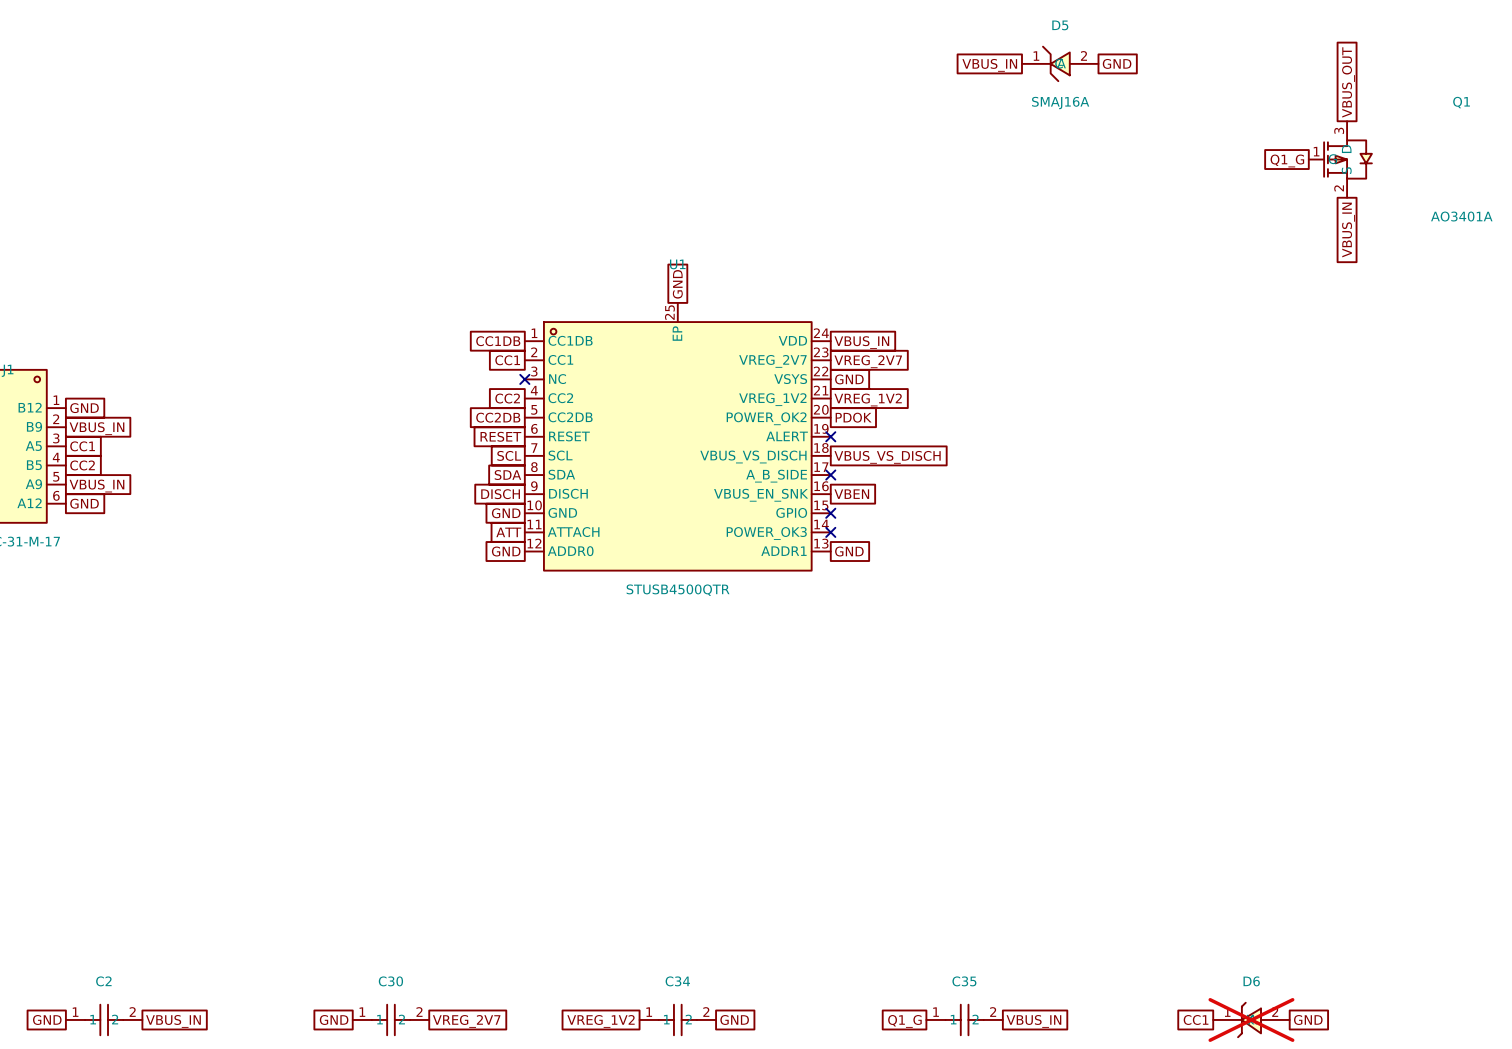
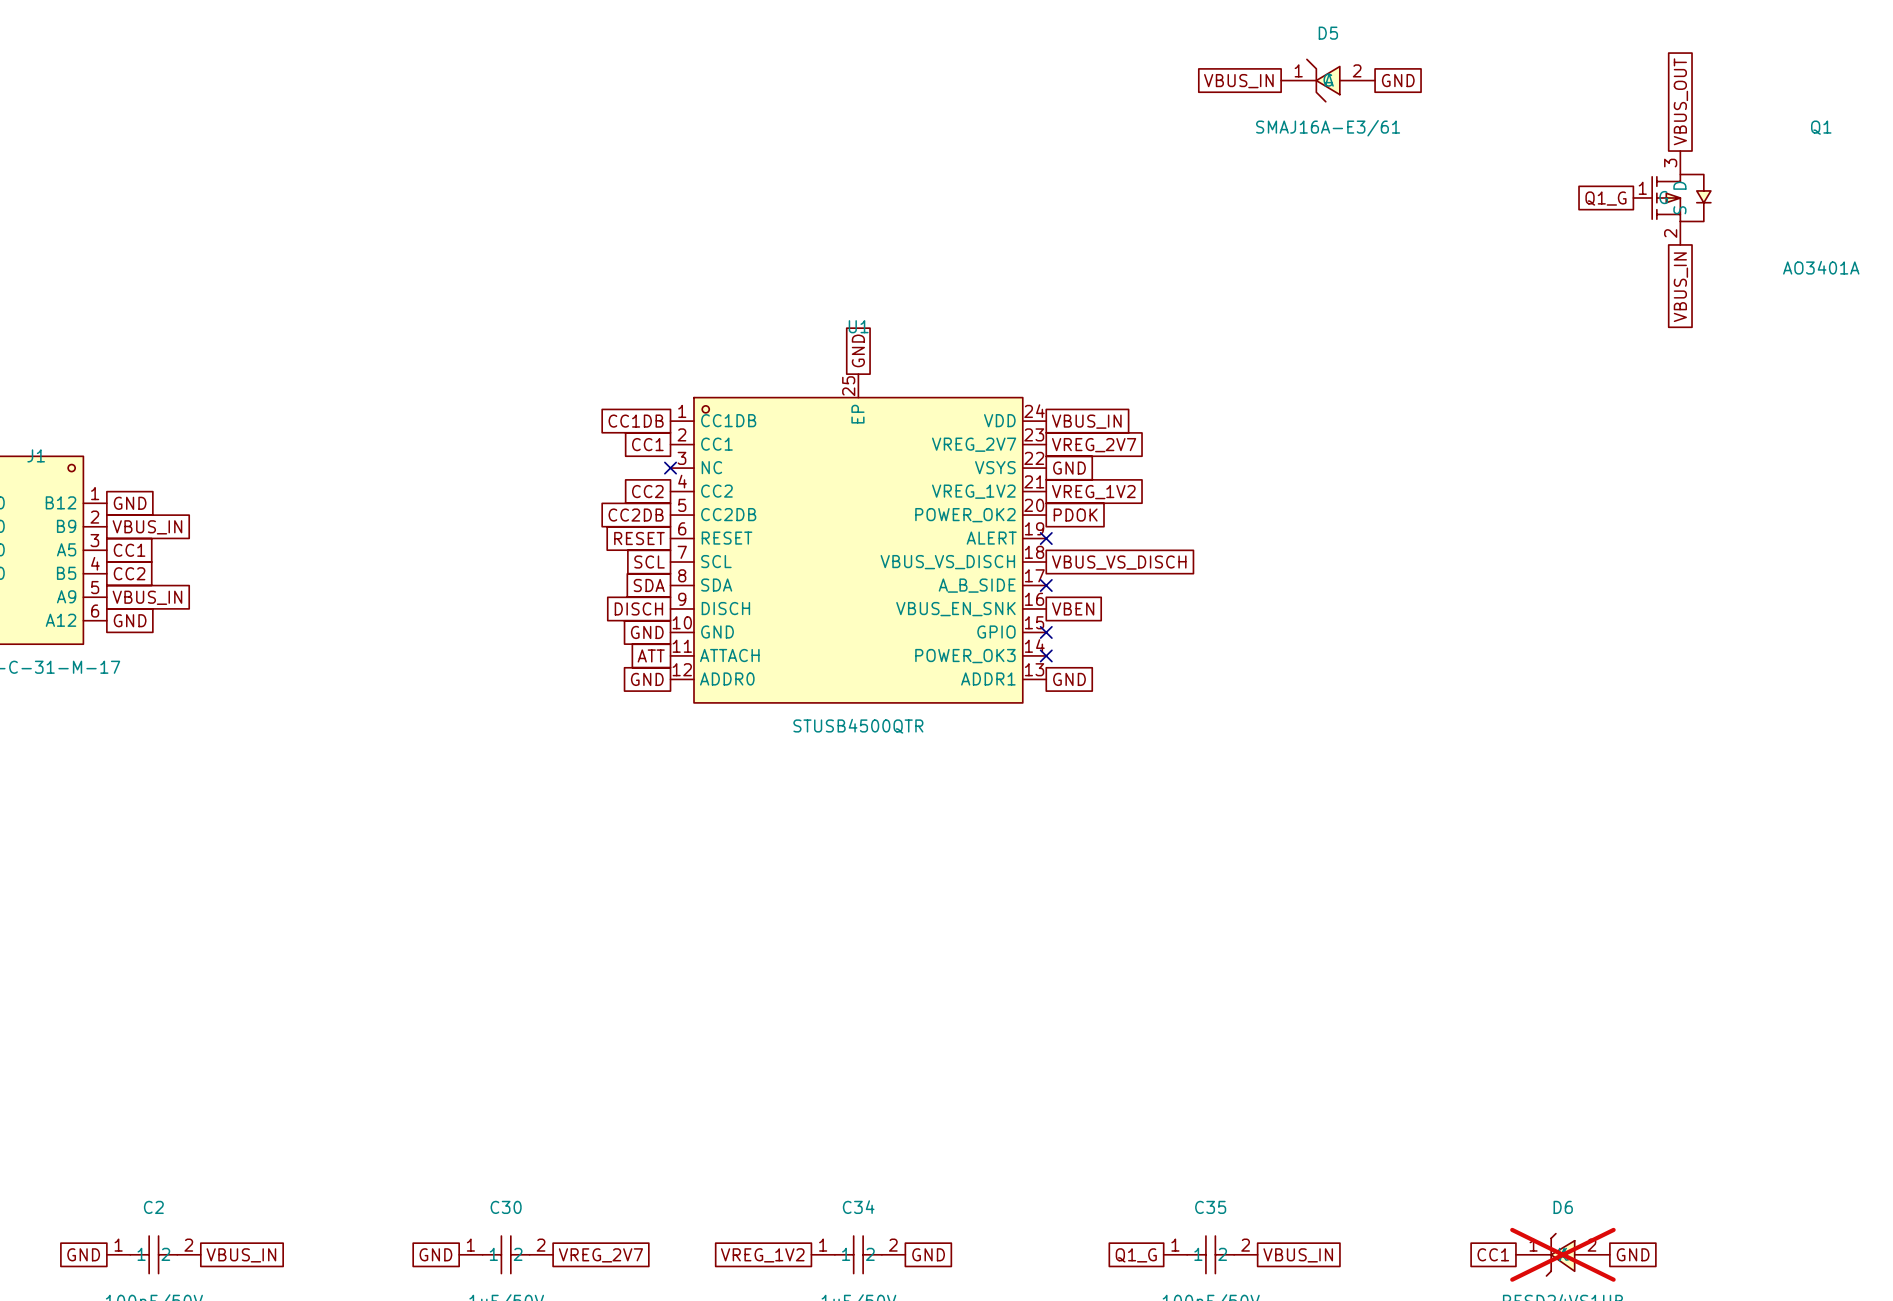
D5 value: SMAJ16A (1060, 103) -> SMAJ16A-E3/61 (1328, 128)

